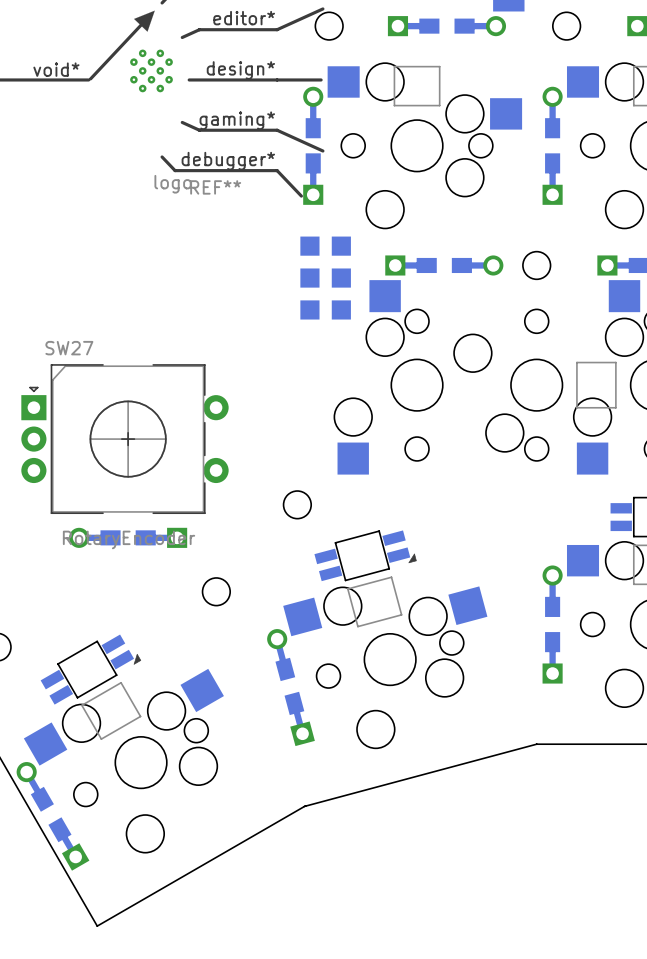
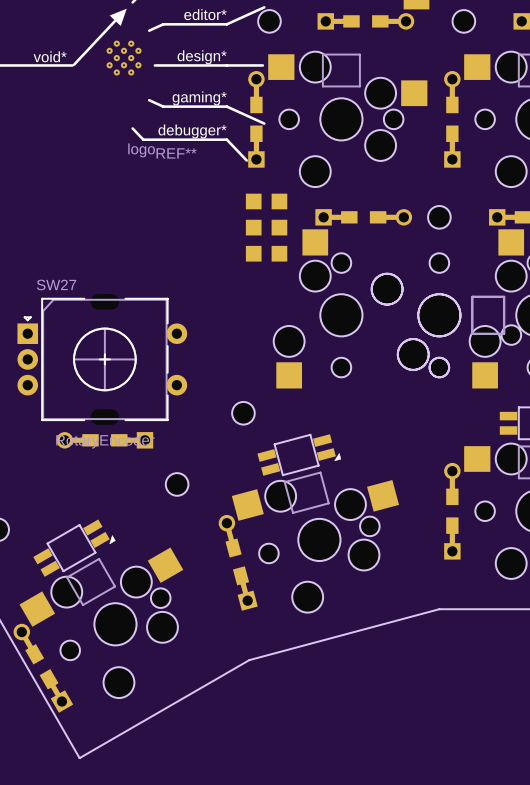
part: none -> (446, 325)

